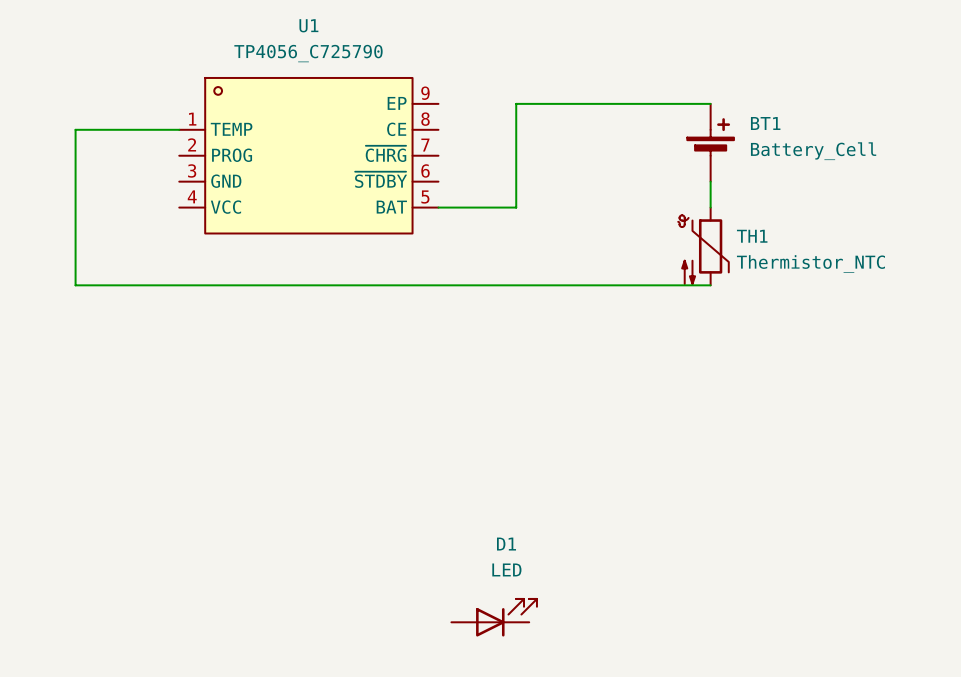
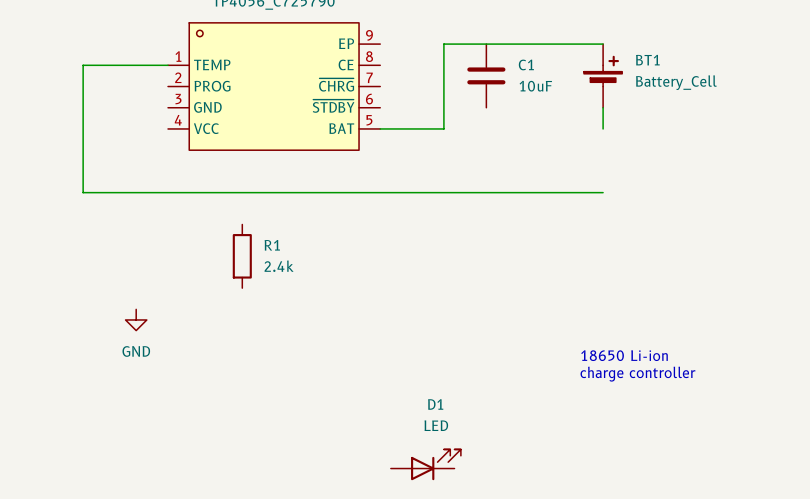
C1: none -> 10uF (486, 75)
TH1: Thermistor_NTC (703, 246) -> none
R1: none -> 2.4k (242, 256)
power symbol: none -> GND (136, 319)
text: none -> 18650 Li-ion (624, 355)
text: none -> charge controller (637, 374)

